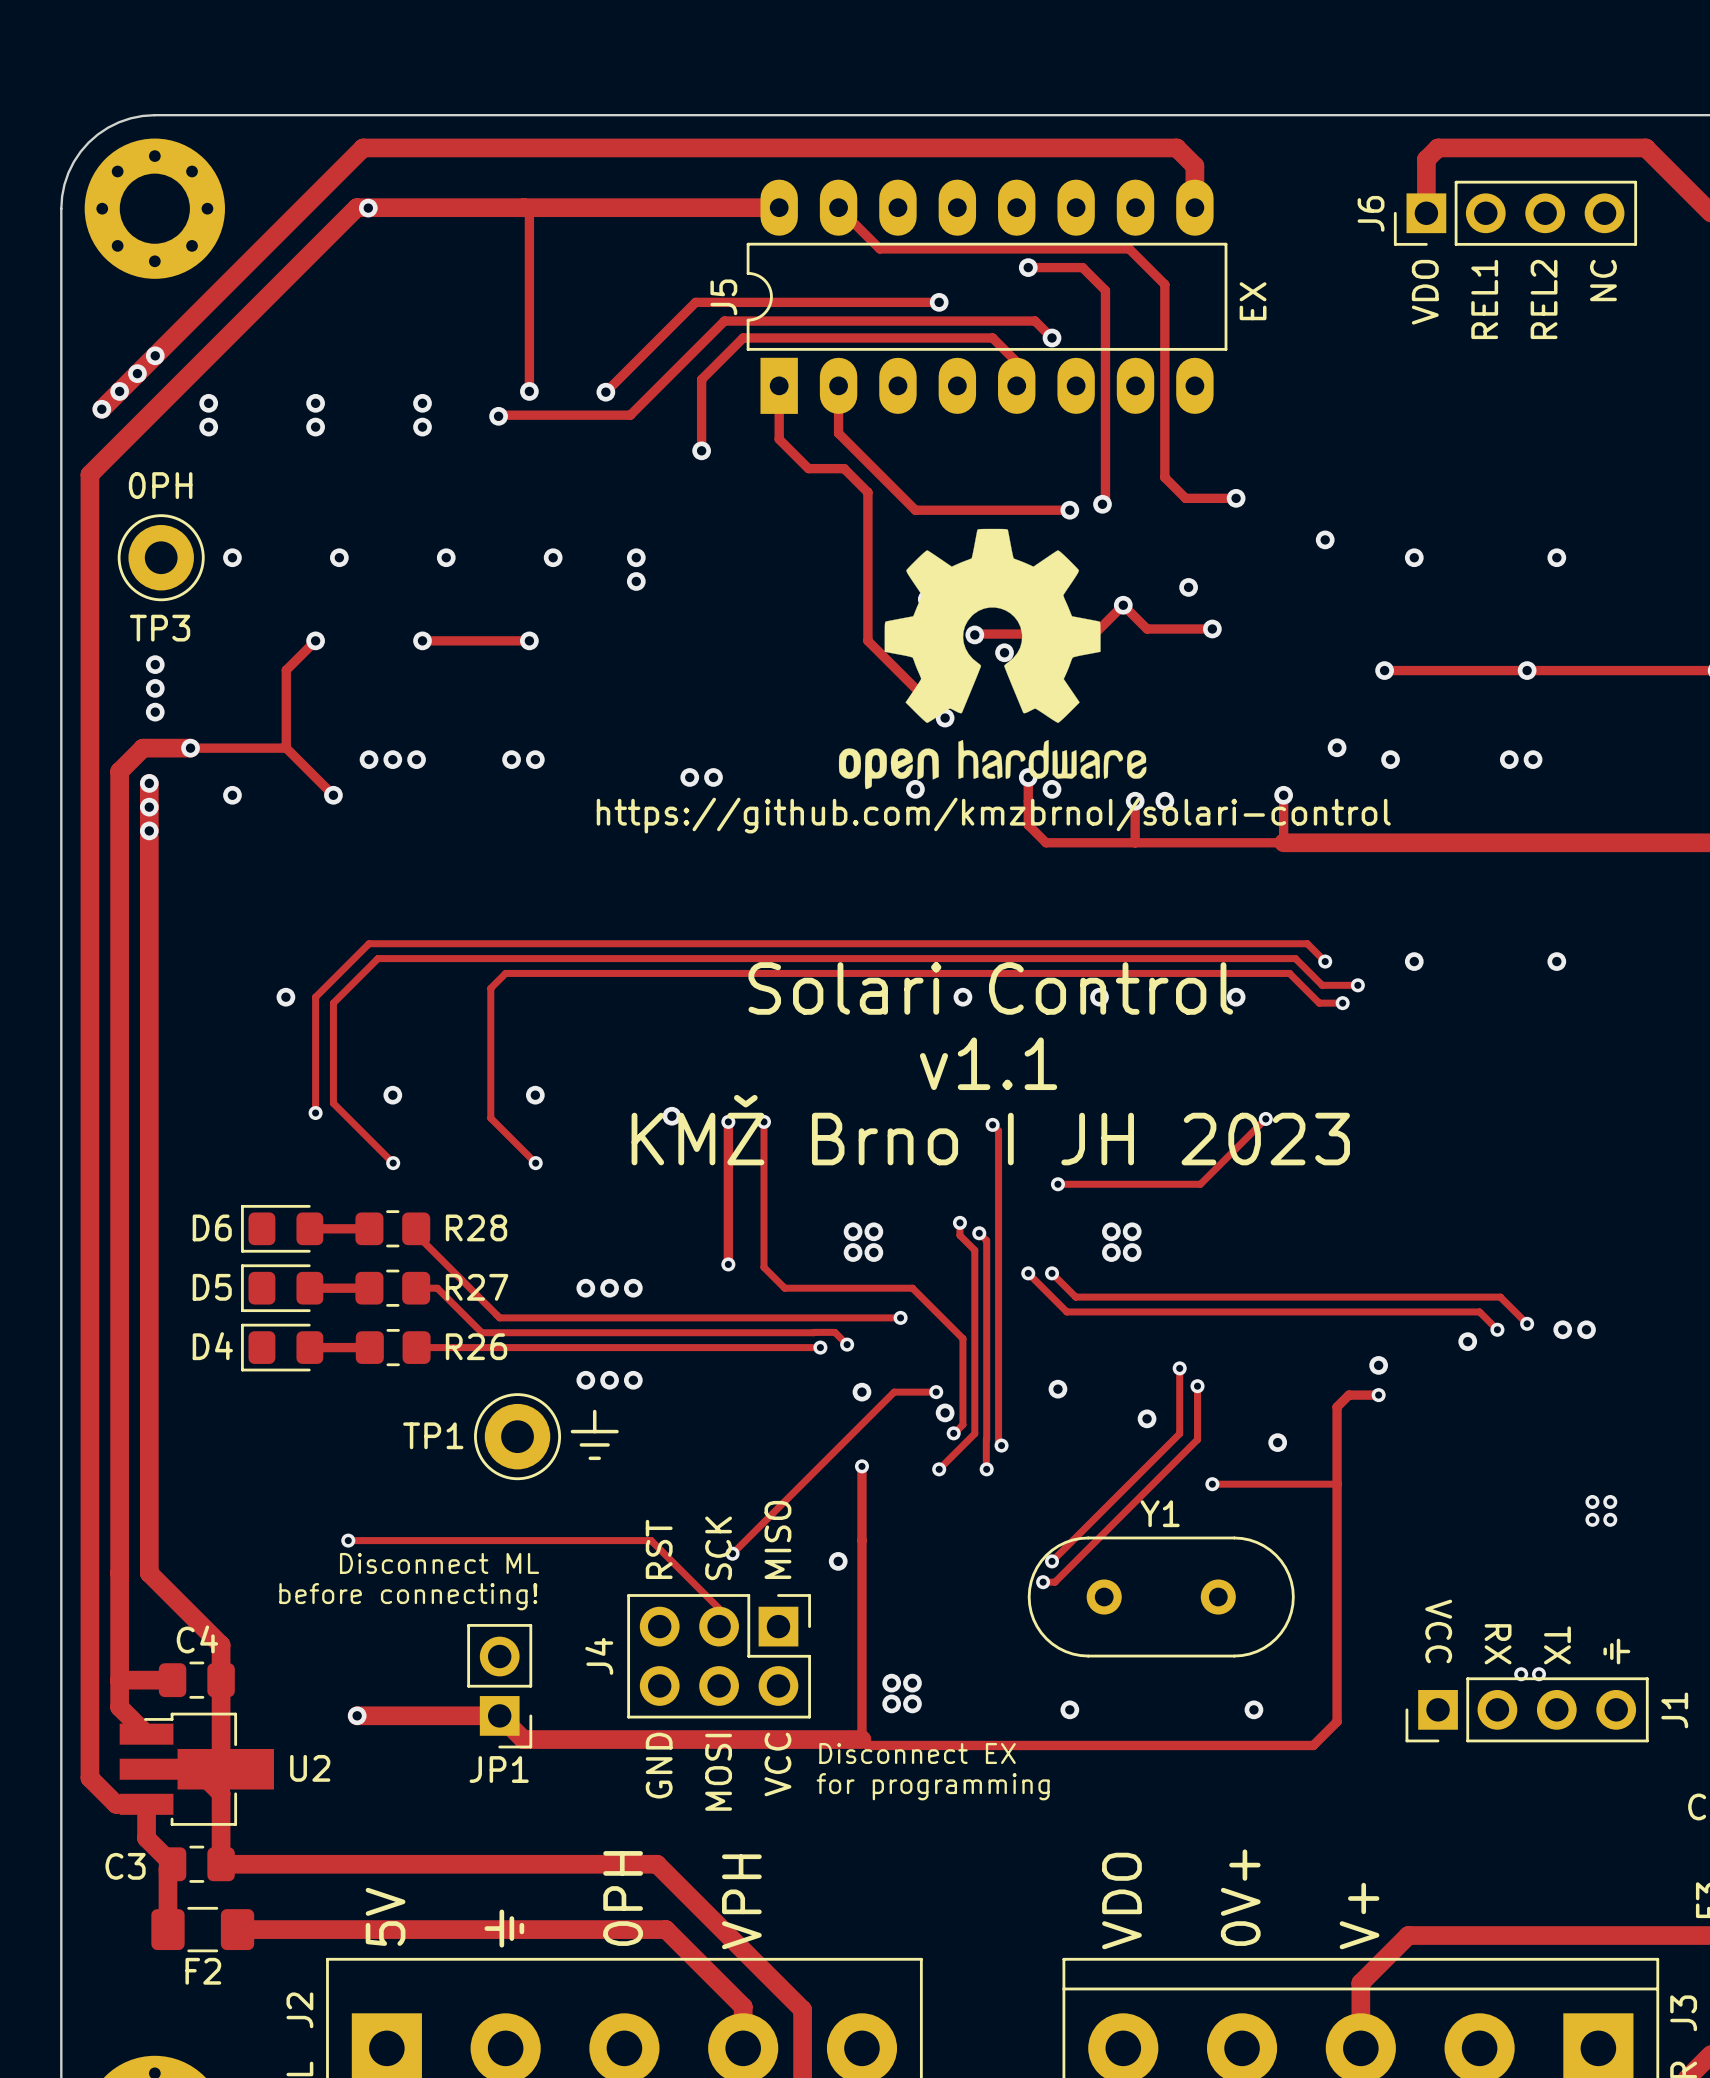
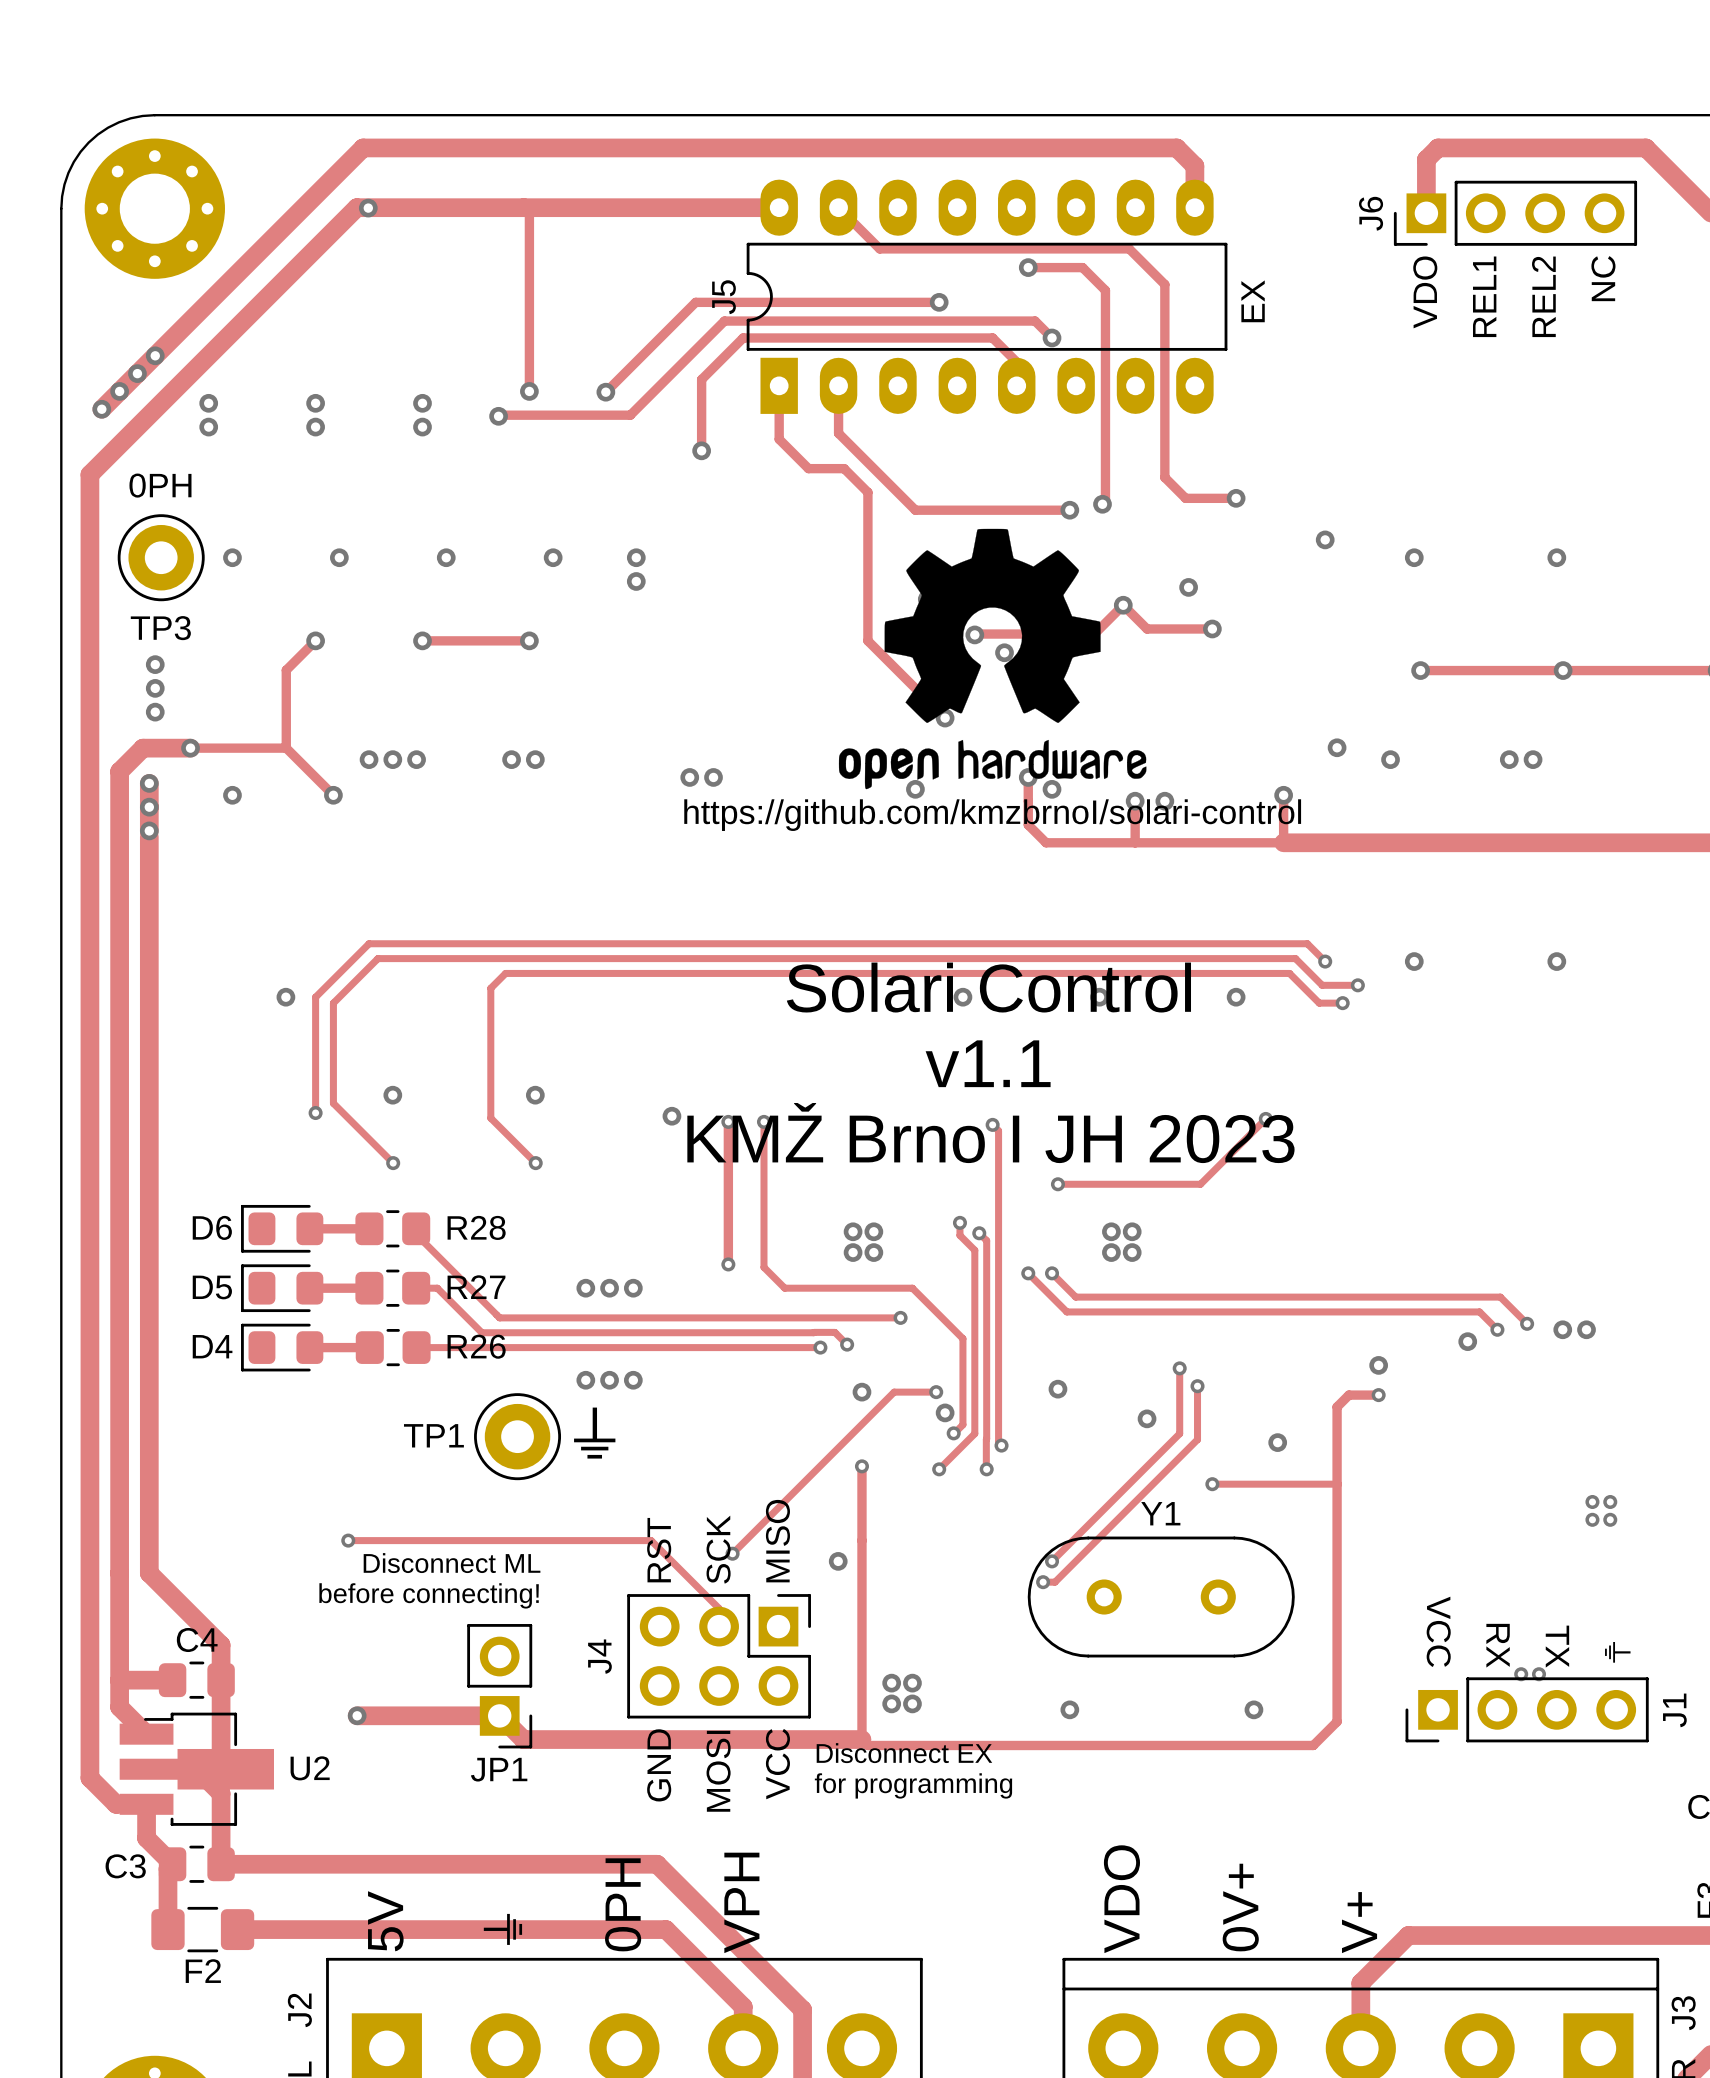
track: (1384, 670) (1420, 670) -> none
via position: (1384, 670) -> (1420, 670)
via position: (1527, 670) -> (1563, 670)

